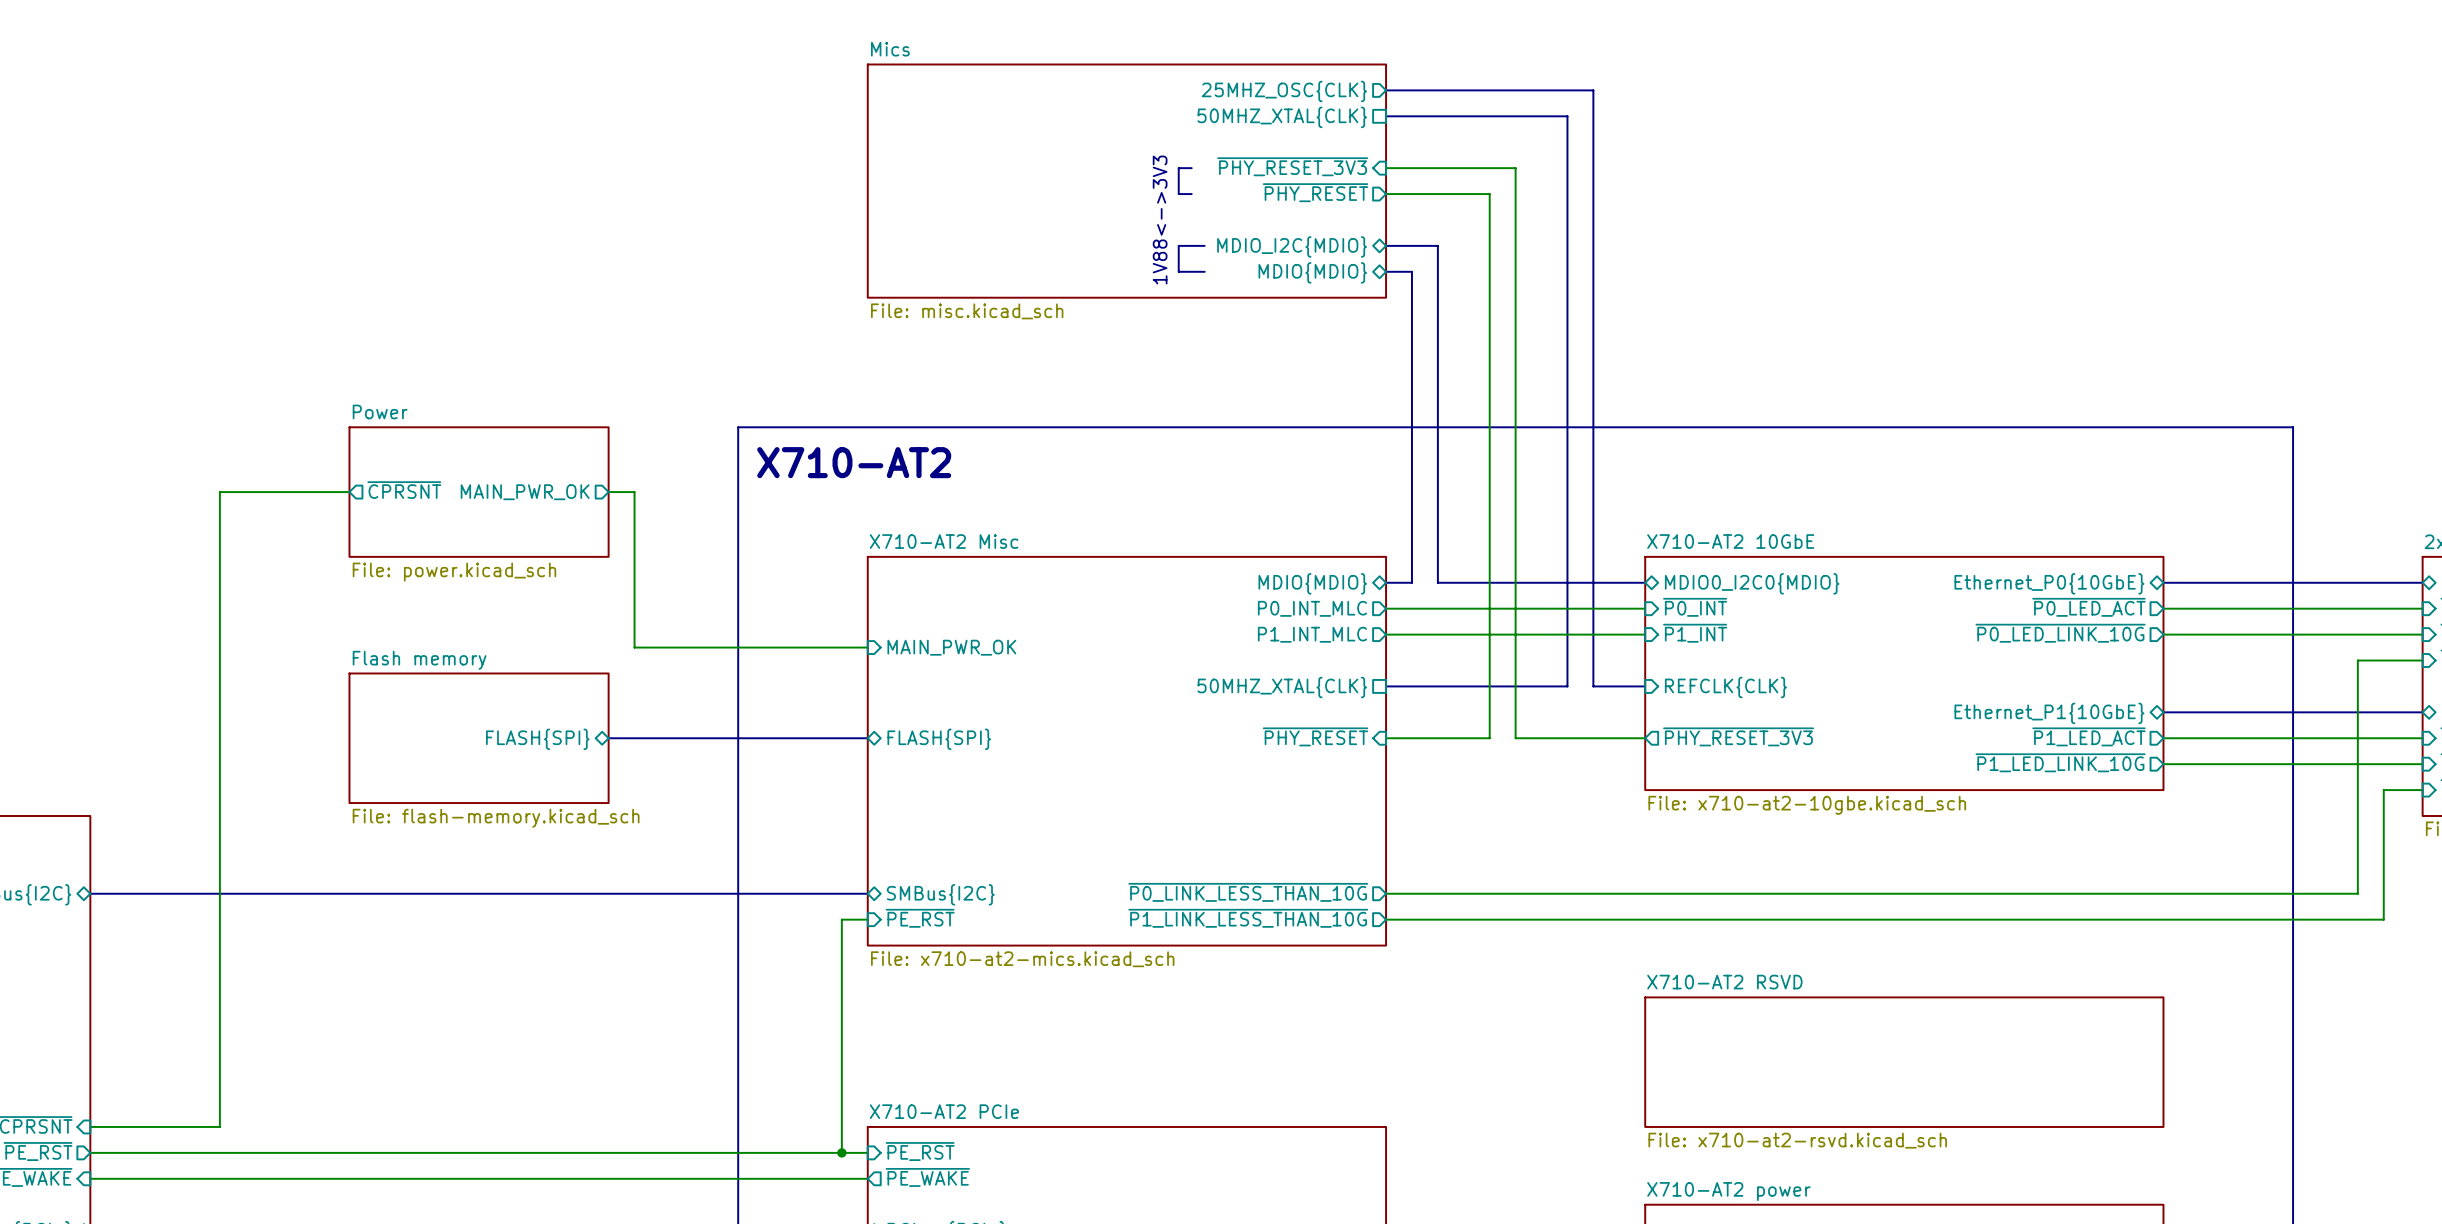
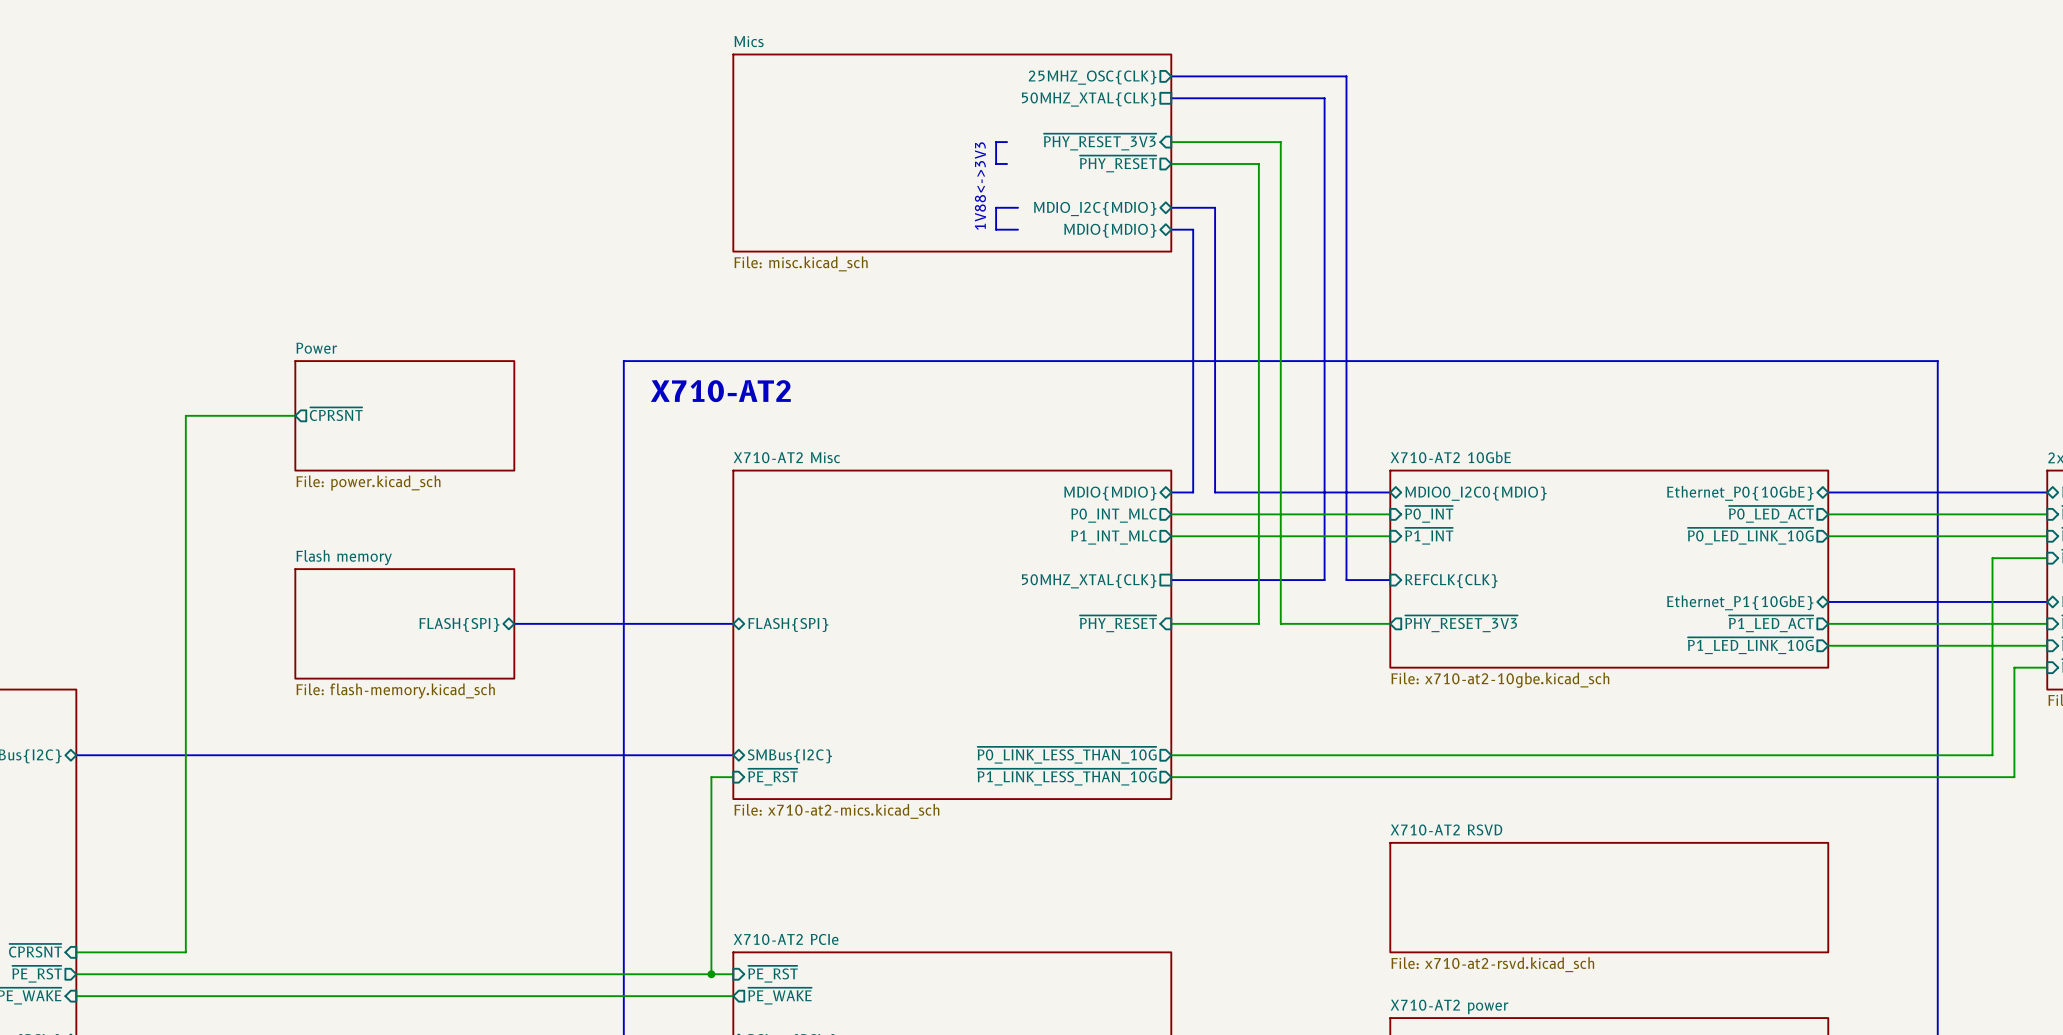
sheet pin: MAIN_PWR_OK (525, 492) -> none
wire: (608, 492) (634, 492) (634, 647) (867, 647) -> none
sheet pin: MAIN_PWR_OK (951, 647) -> none

